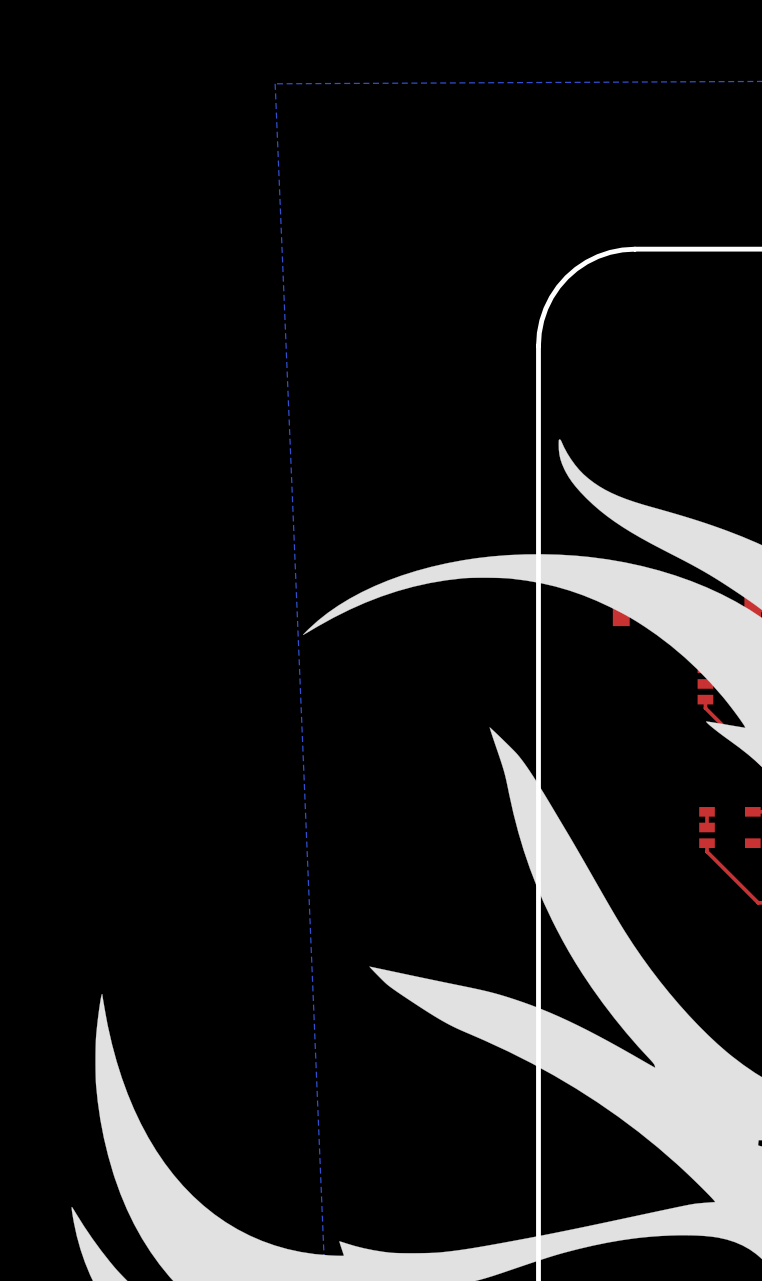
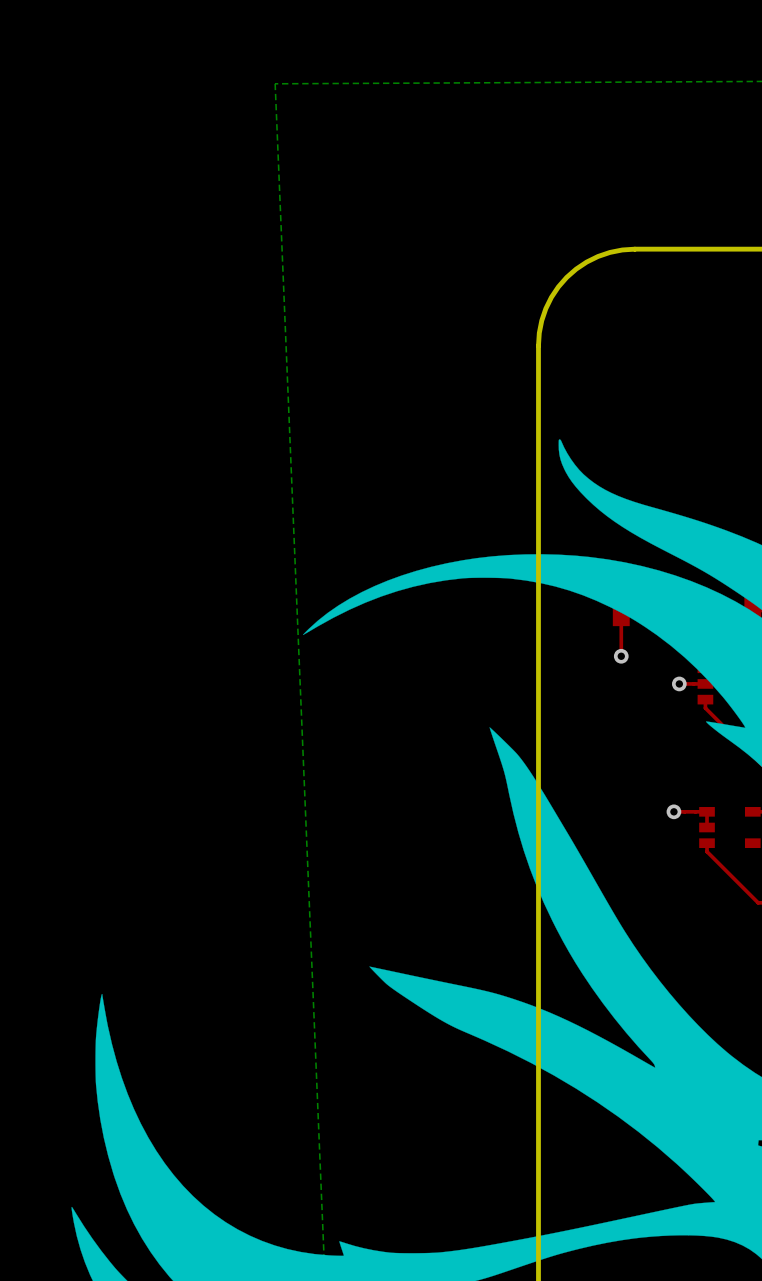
top track: none -> (621, 622) (621, 656)
via: none -> (621, 656)
via: none -> (679, 683)
top track: none -> (705, 683) (679, 683)
via: none -> (673, 811)
top track: none -> (707, 811) (673, 811)

